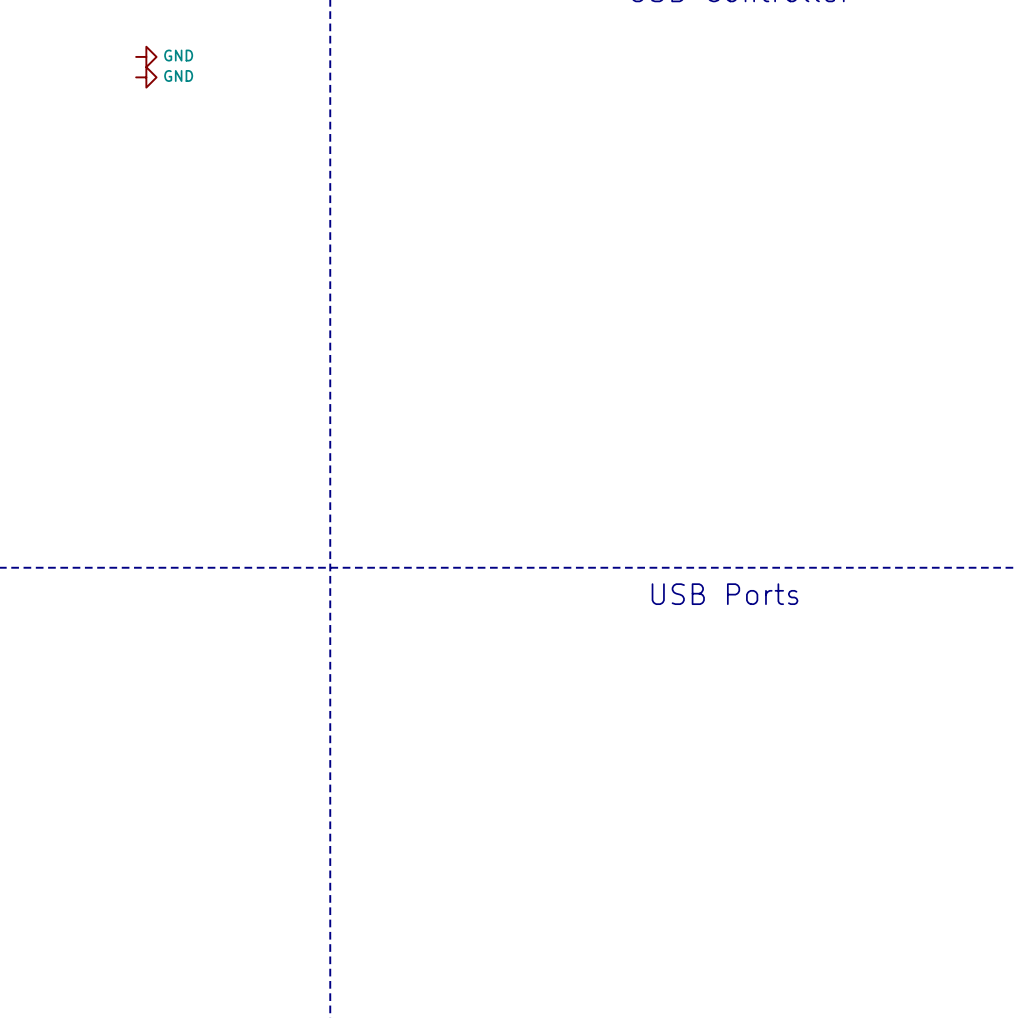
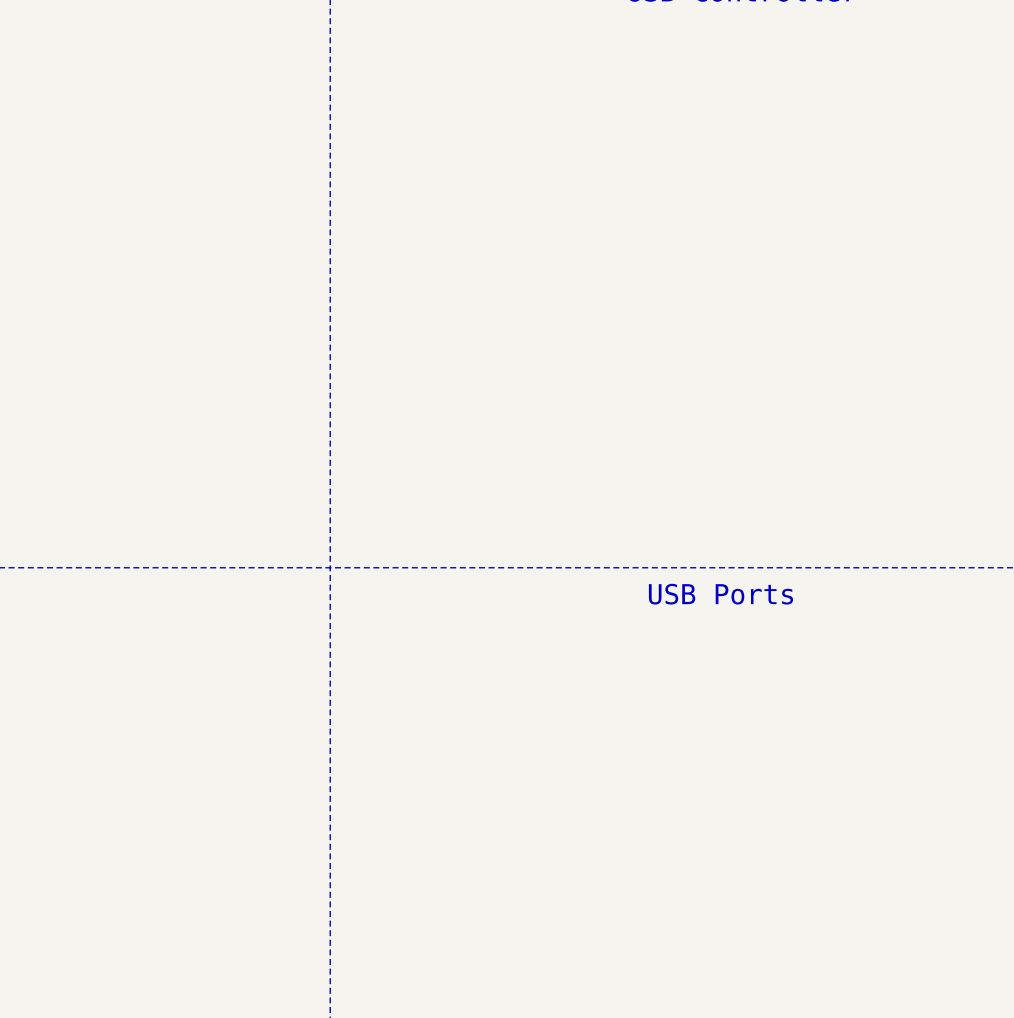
power symbol: GND (146, 56) -> none
power symbol: GND (146, 77) -> none

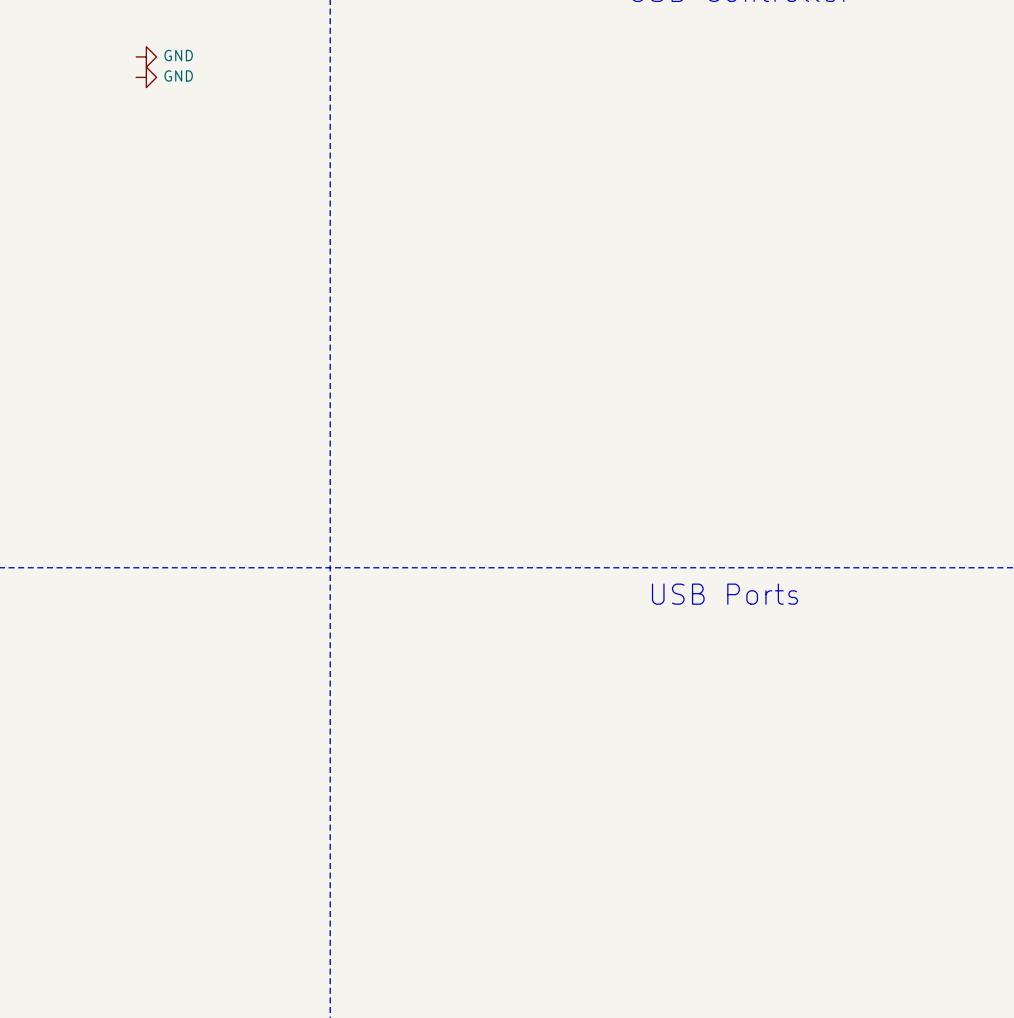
power symbol: none -> GND (146, 56)
power symbol: none -> GND (146, 77)

